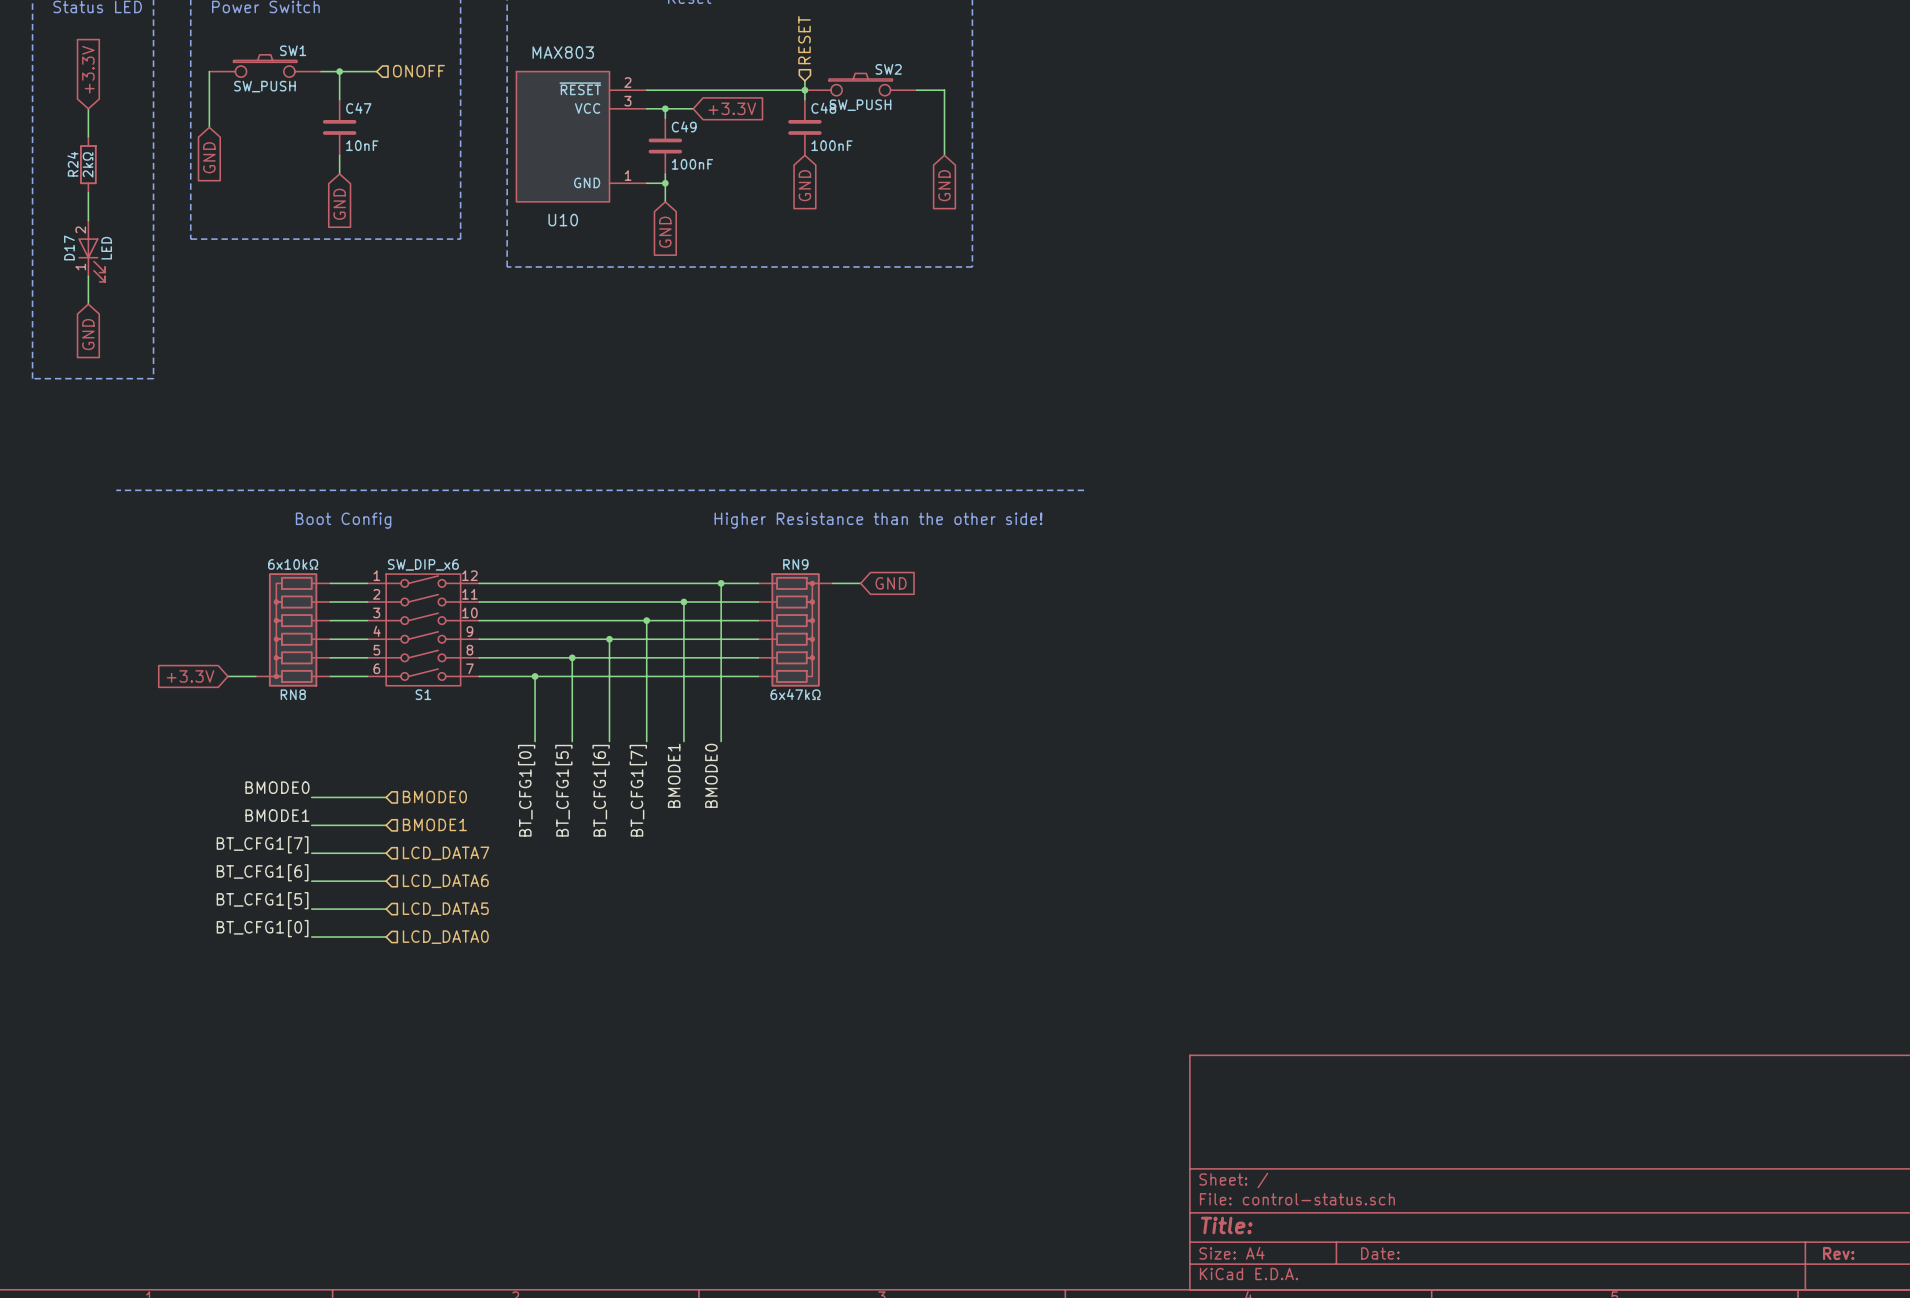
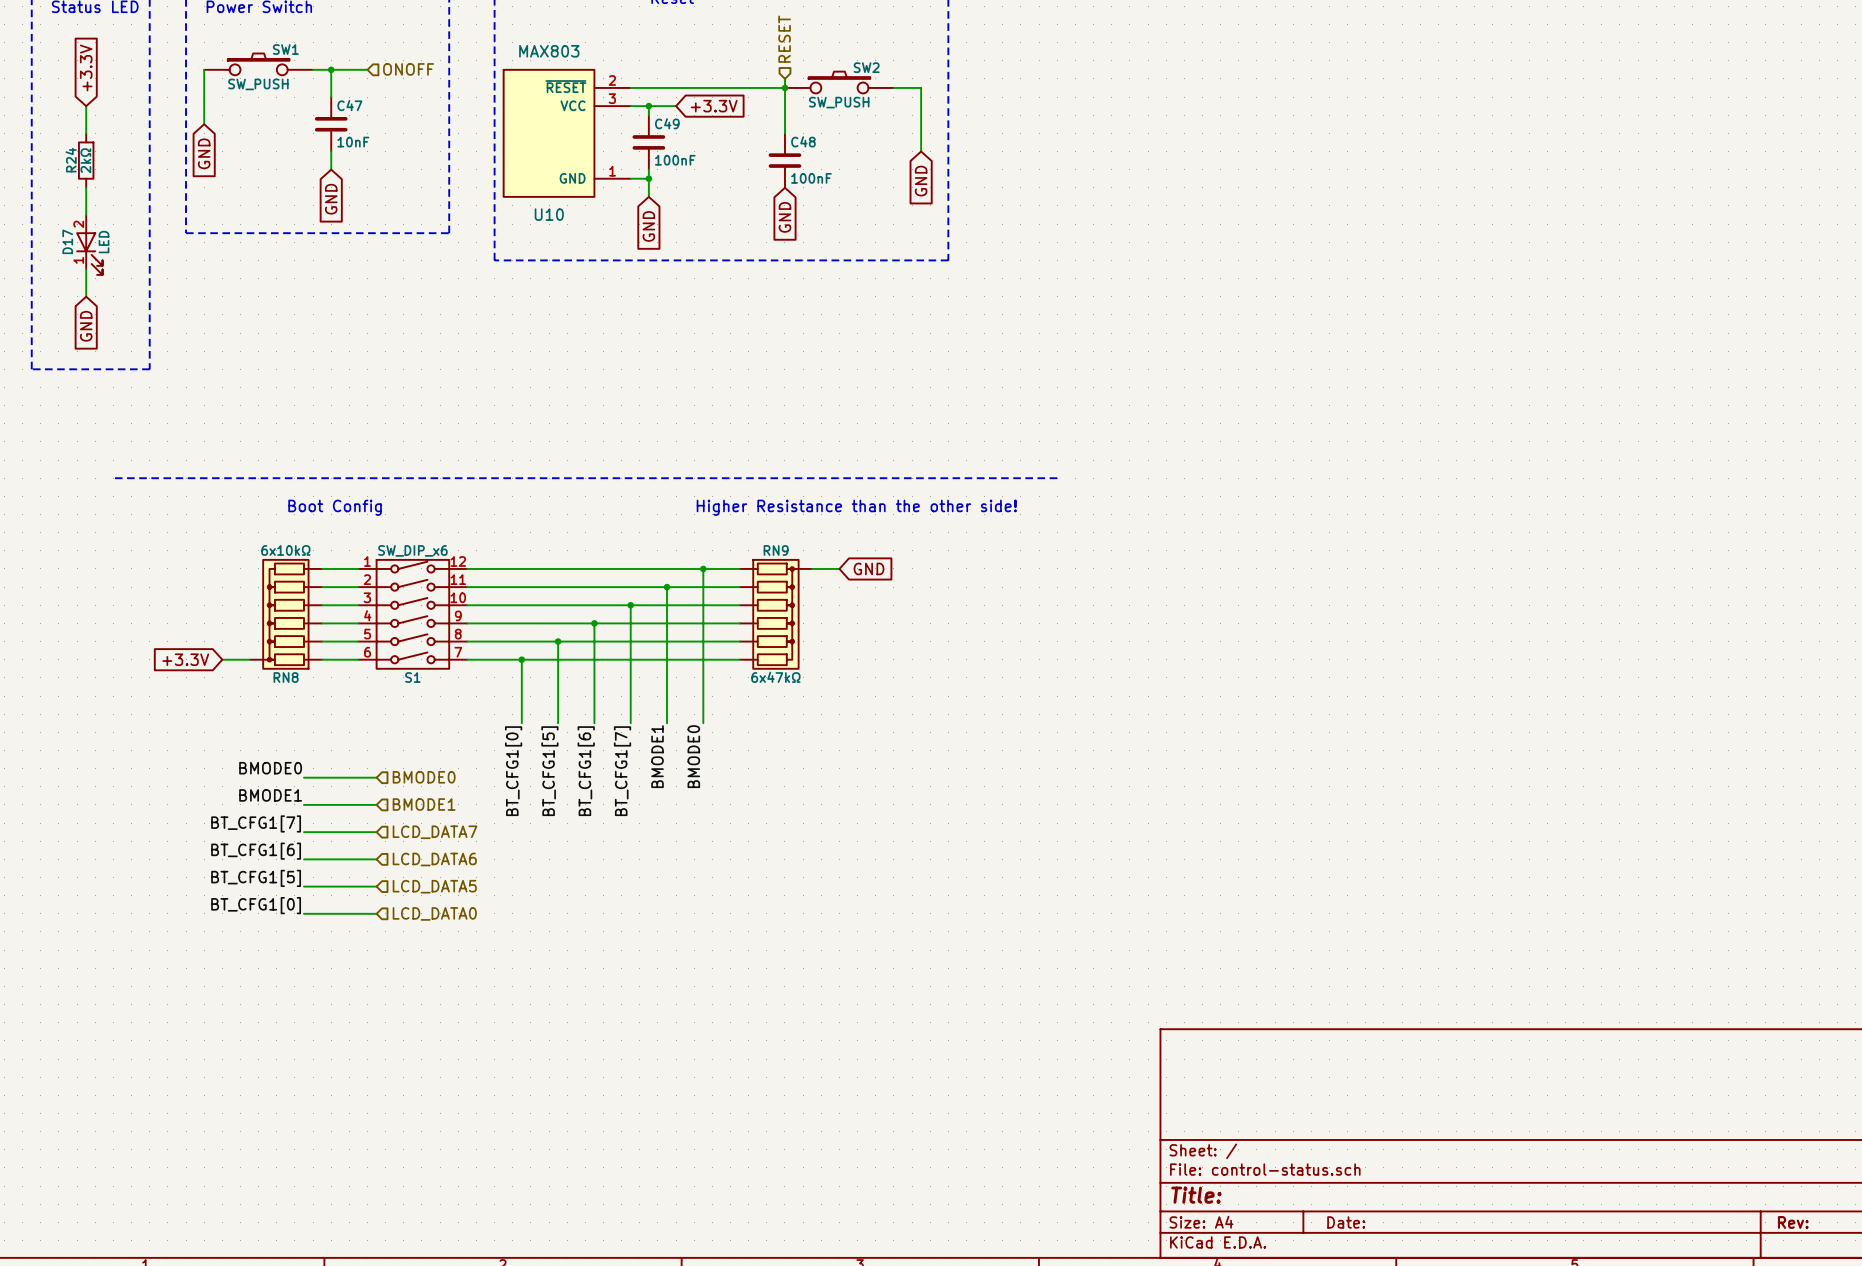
C48 position: (804, 127) -> (784, 160)
global label position: GND (804, 185) -> GND (784, 217)

